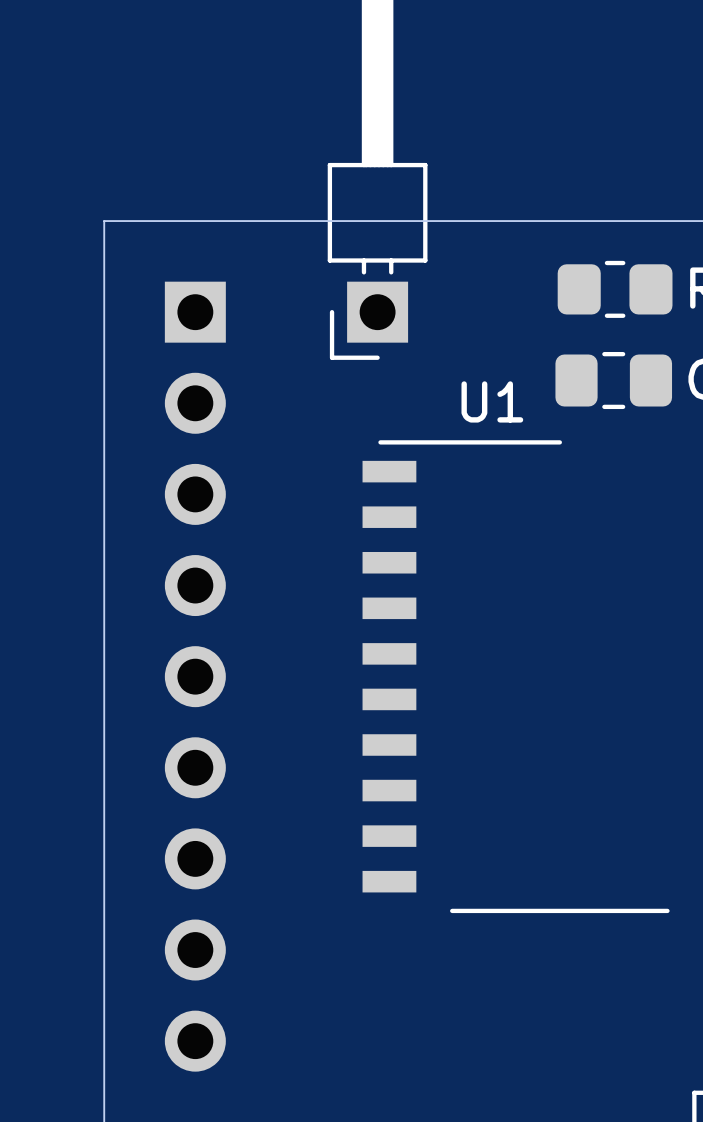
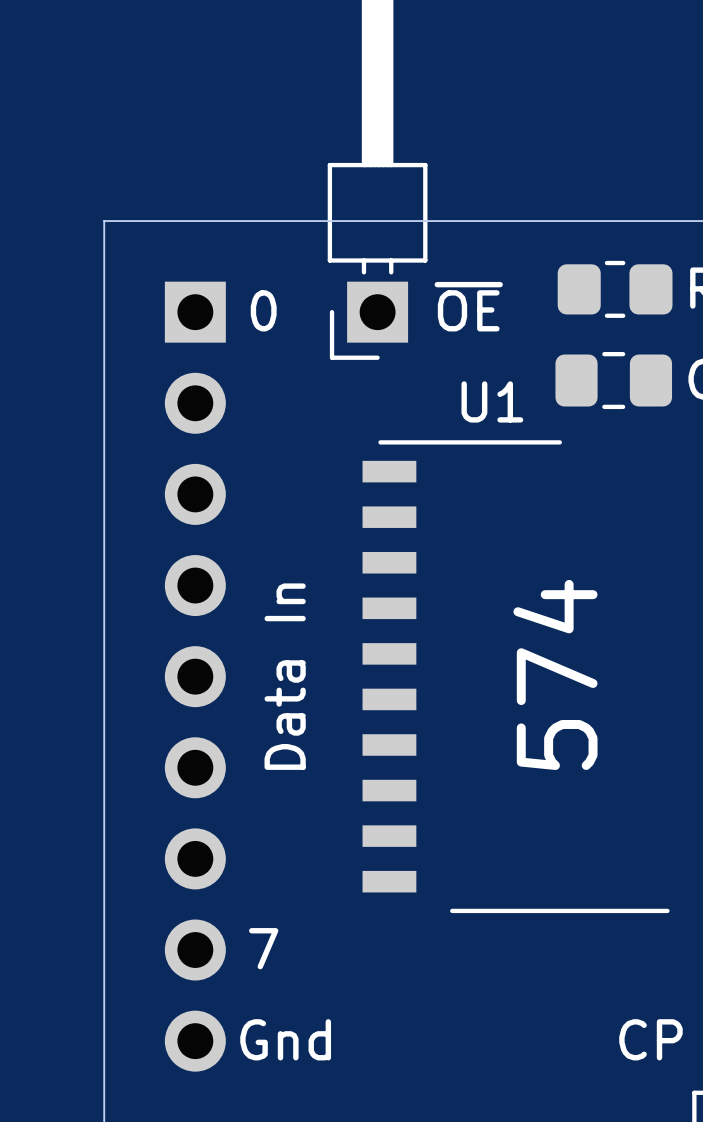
text: none -> ~{OE} (468, 306)
text: none -> 0 (263, 310)
text: none -> 574 (555, 674)
text: none -> Data In (285, 676)
text: none -> 7 (263, 948)
text: none -> Gnd (285, 1039)
text: none -> CP (650, 1039)

